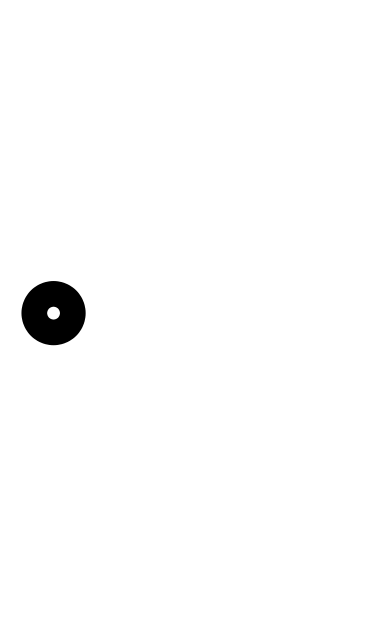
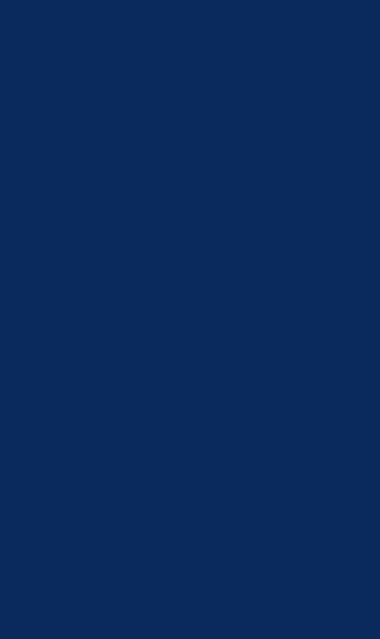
part: (53, 313) -> none

